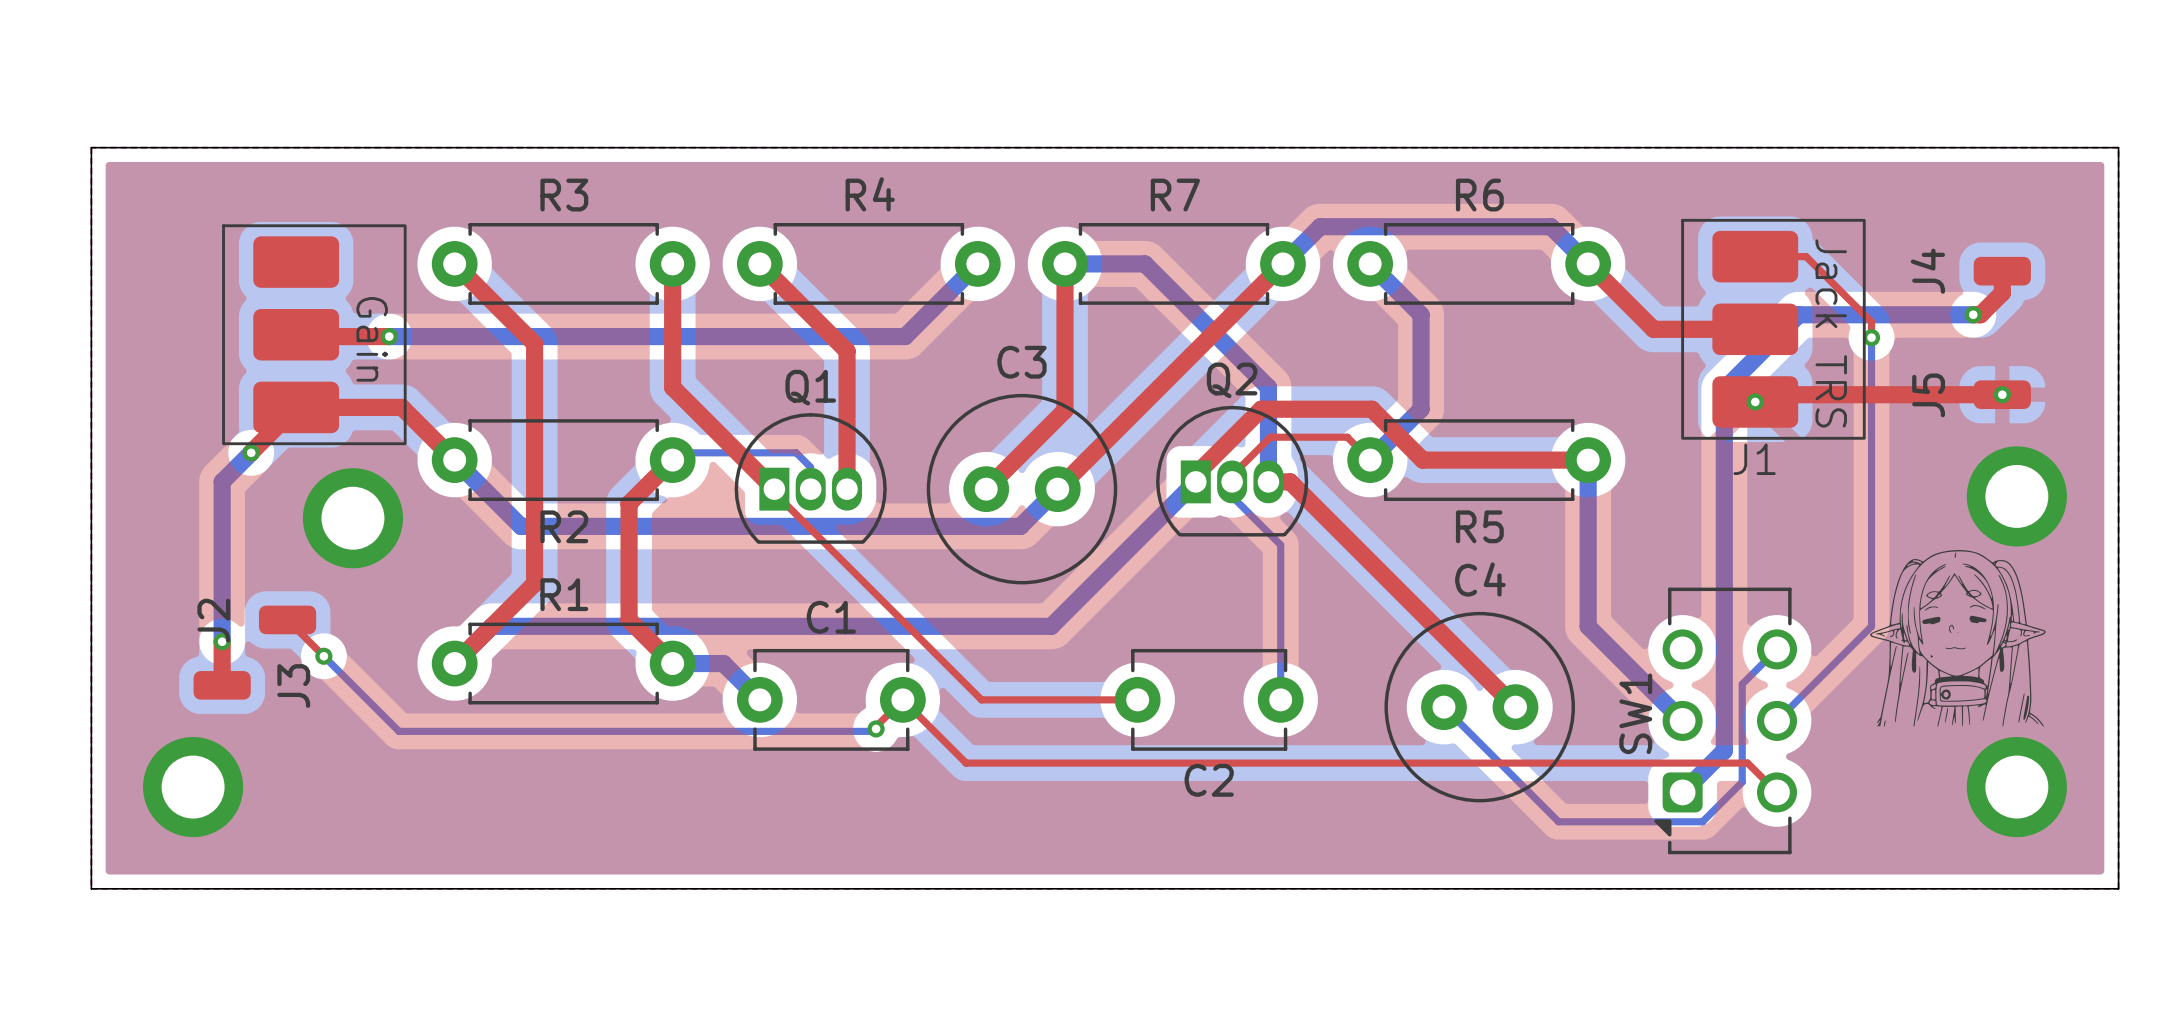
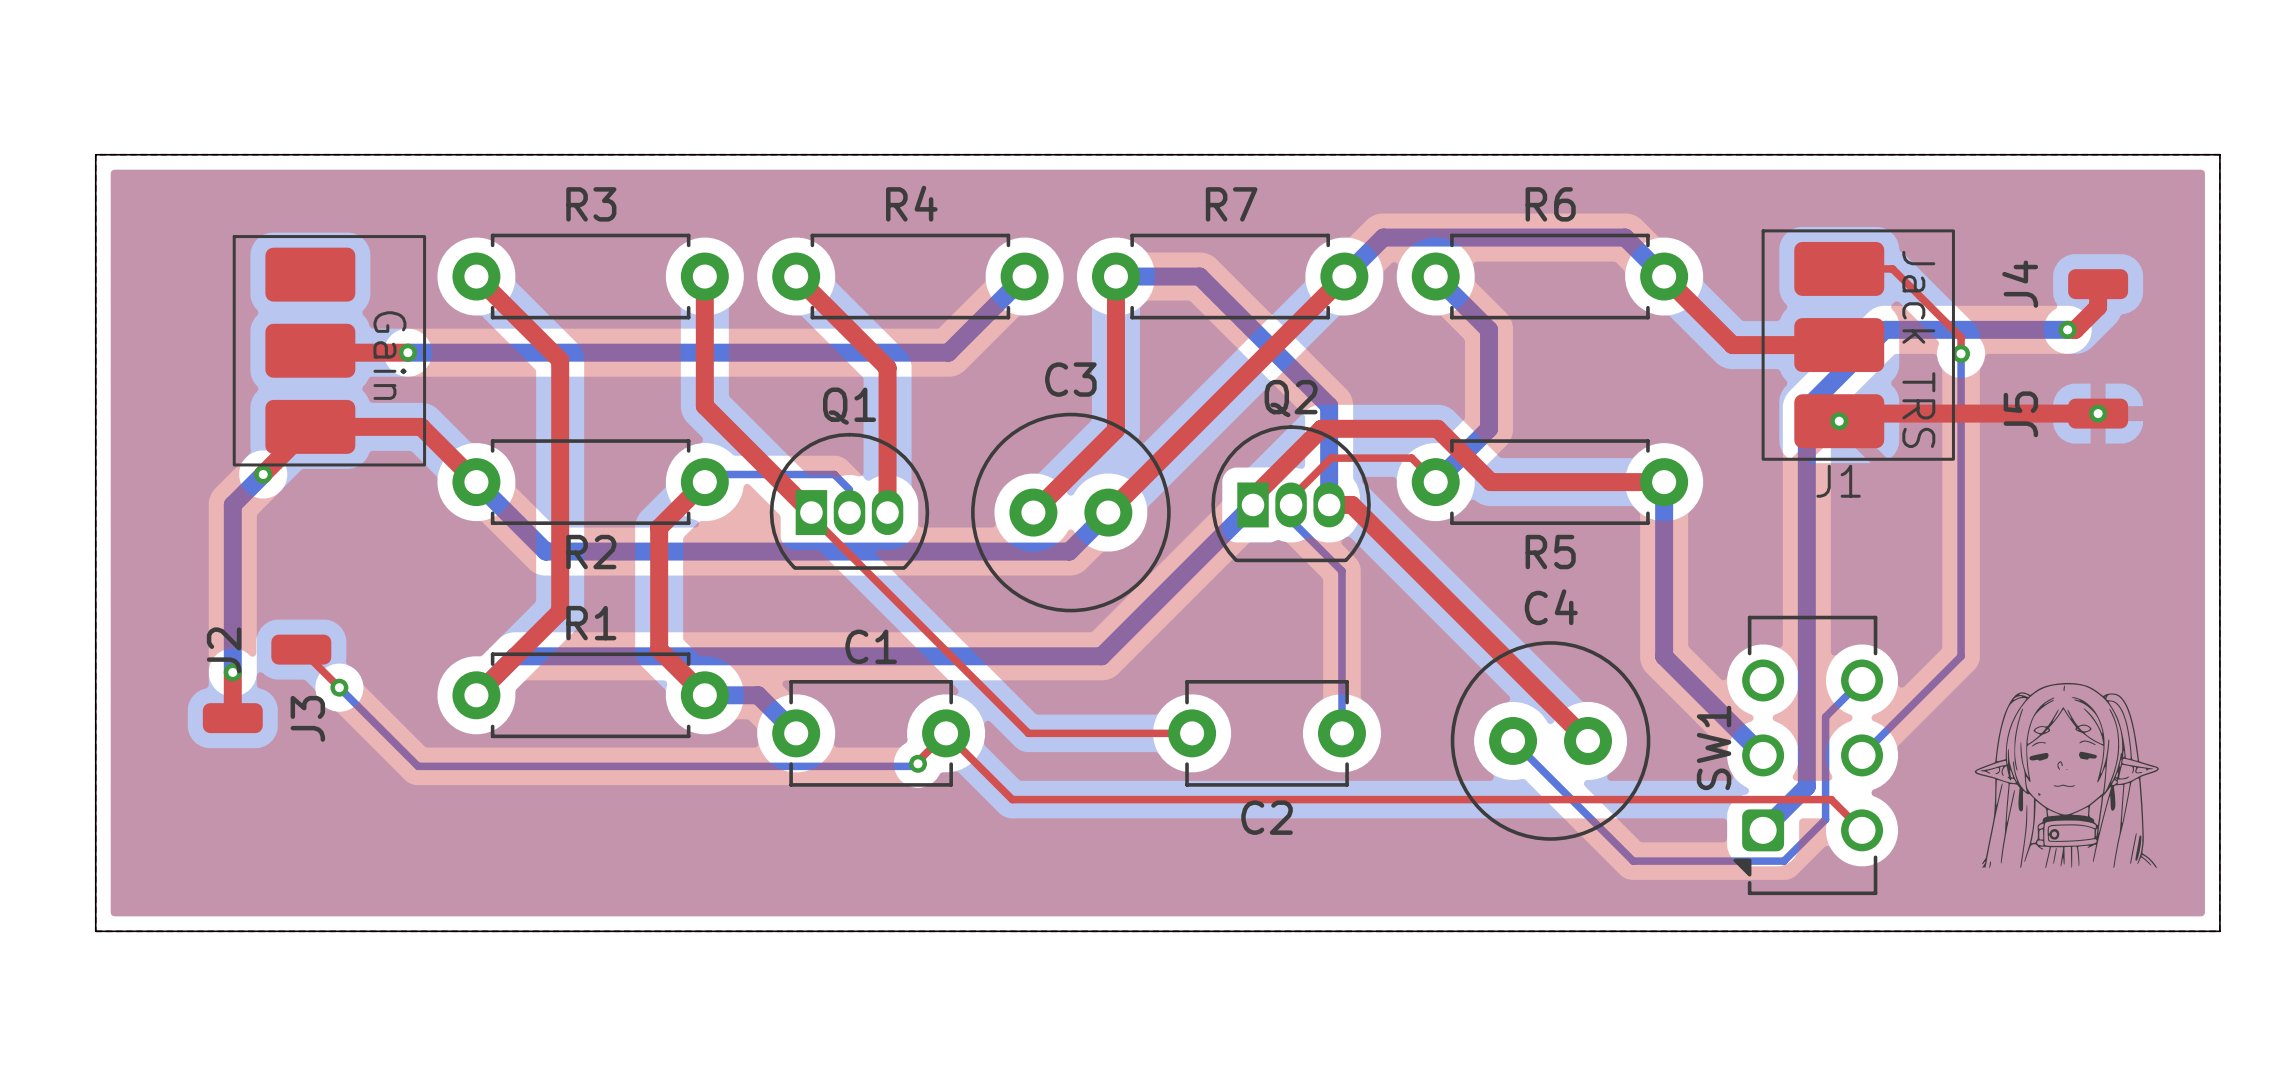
part: (2016, 496) -> none
part: (352, 518) -> none
drawing position: (1957, 638) -> (2066, 775)
part: (193, 787) -> none
part: (2016, 787) -> none

